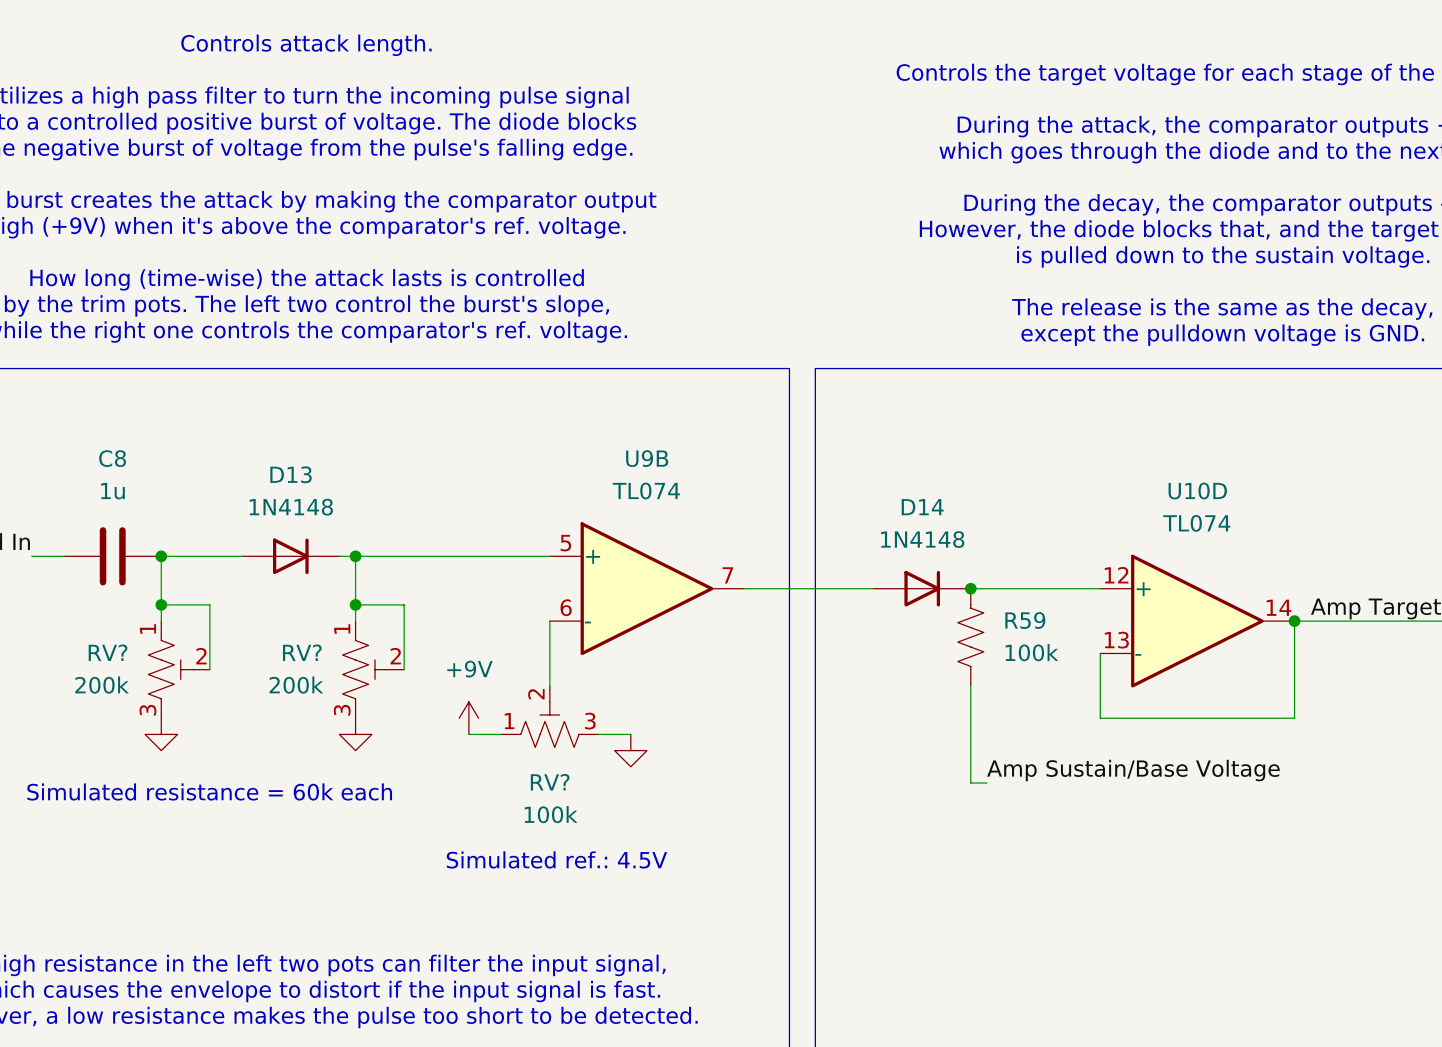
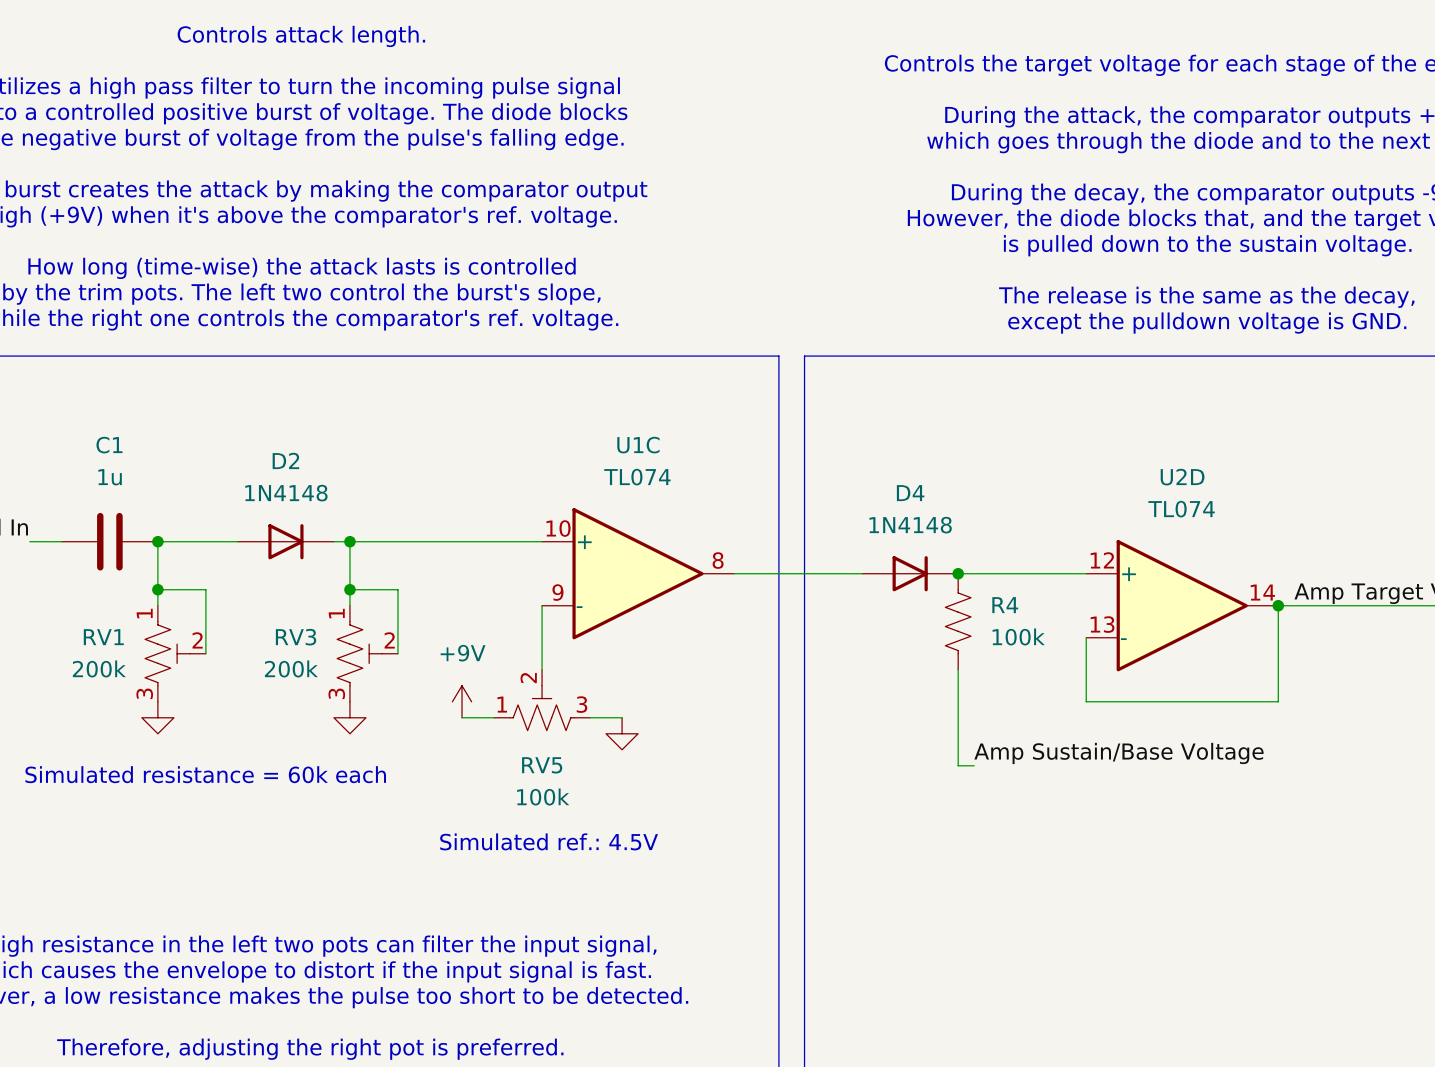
C8 name: C8 (112, 458) -> C1 (109, 445)
U9B name: U9B (647, 458) -> U1C (638, 445)
D13 name: D13 (291, 474) -> D2 (285, 460)
U10D name: U10D (1197, 490) -> U2D (1182, 477)
D14 name: D14 (922, 507) -> D4 (910, 493)
U9B pin number: 5 (565, 543) -> 10 (558, 528)
U9B pin number: 7 (727, 575) -> 8 (718, 560)
U9B pin number: 6 (566, 607) -> 9 (557, 592)
R59 name: R59 (1025, 620) -> R4 (1005, 605)
RV? name: RV? (108, 652) -> RV1 (103, 637)
RV? name: RV? (302, 652) -> RV3 (296, 637)
RV? name: RV? (550, 782) -> RV5 (542, 765)

